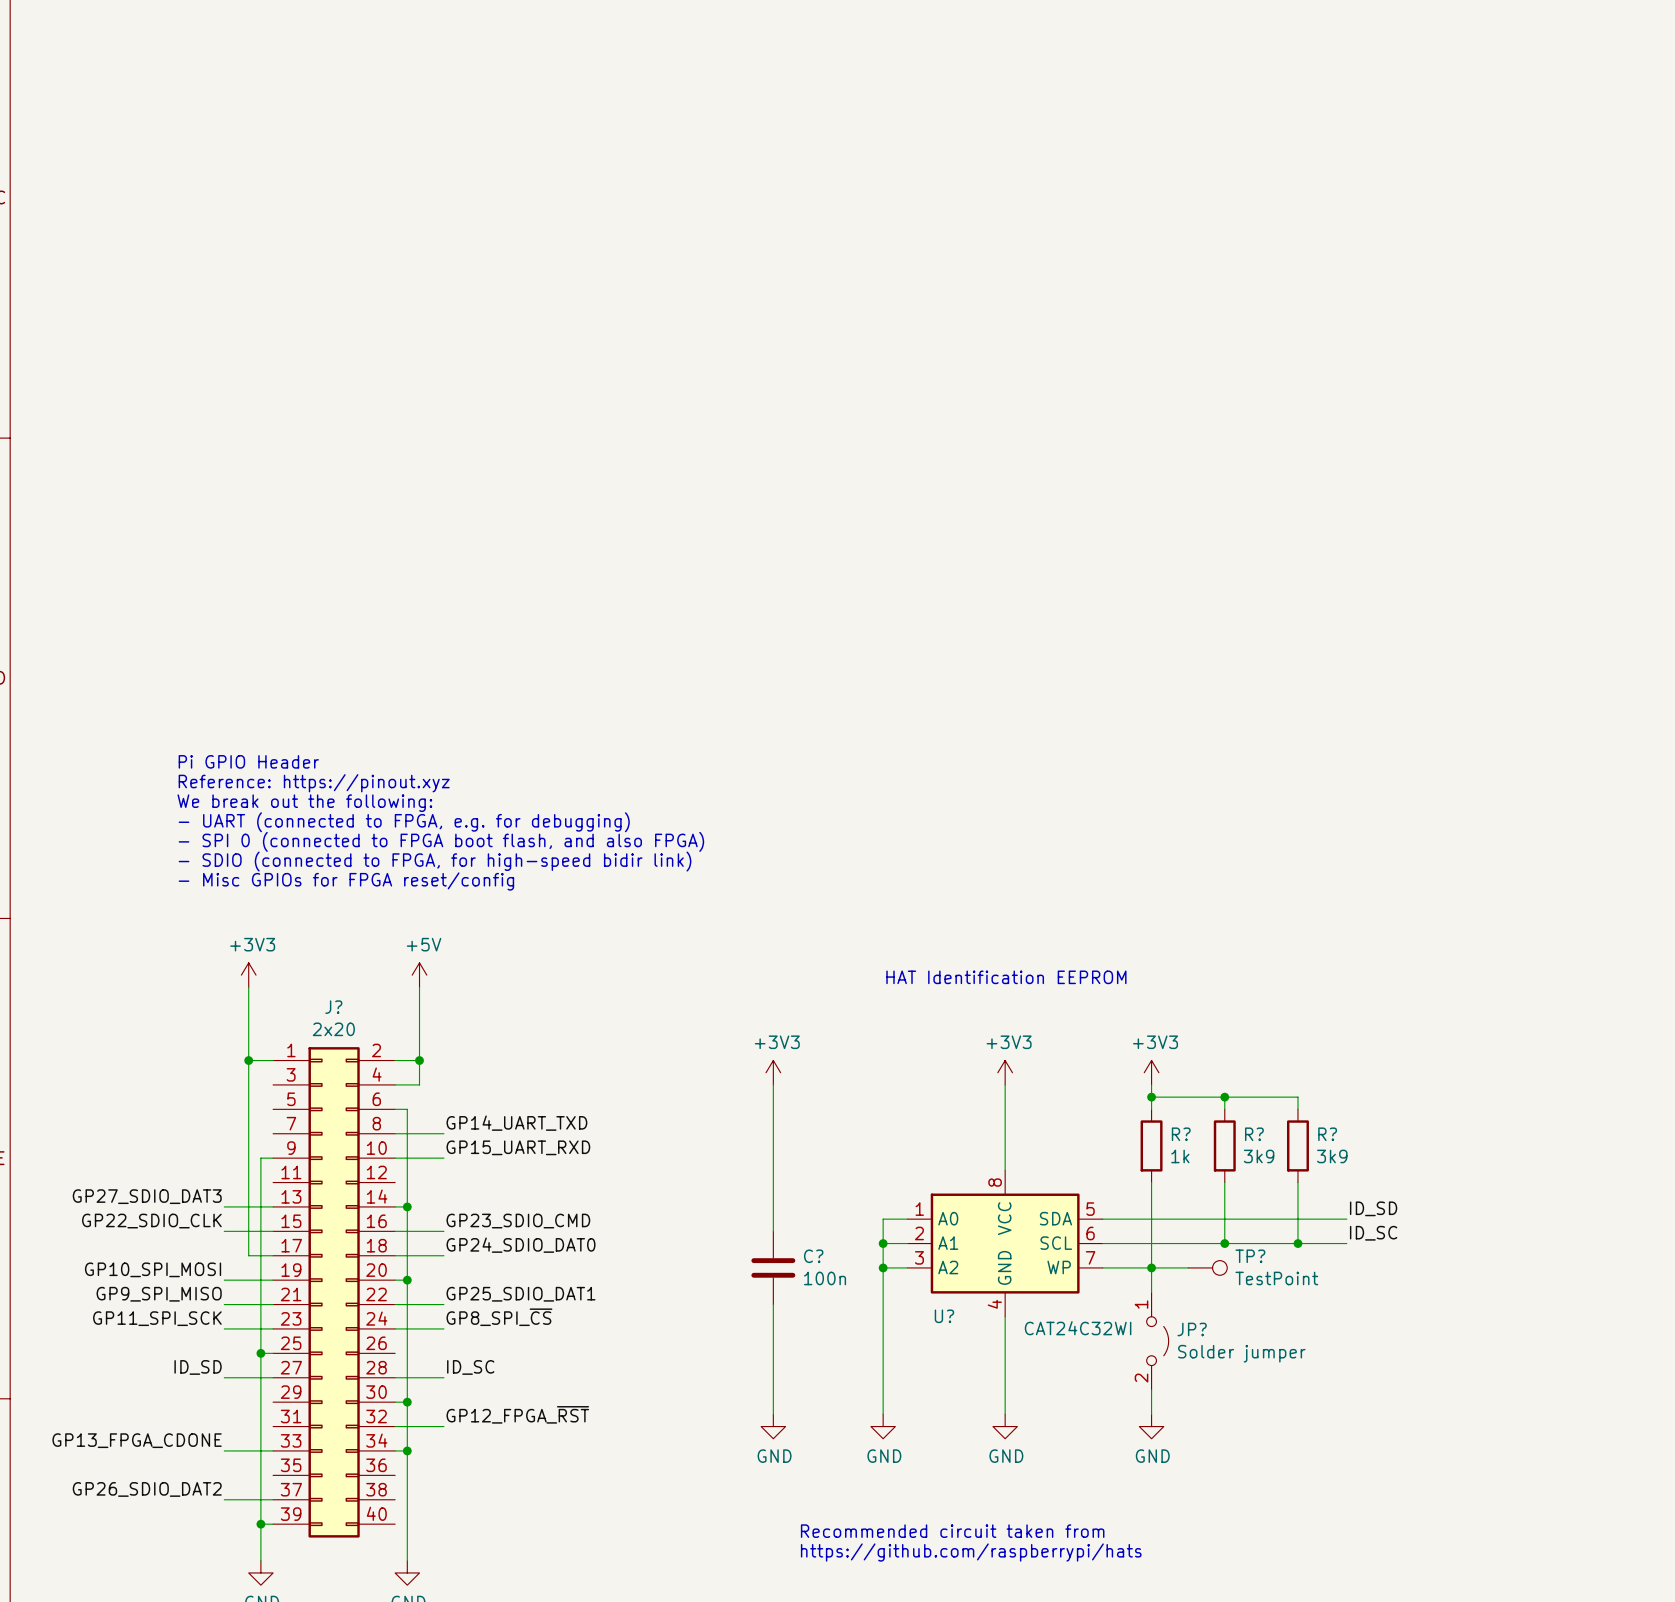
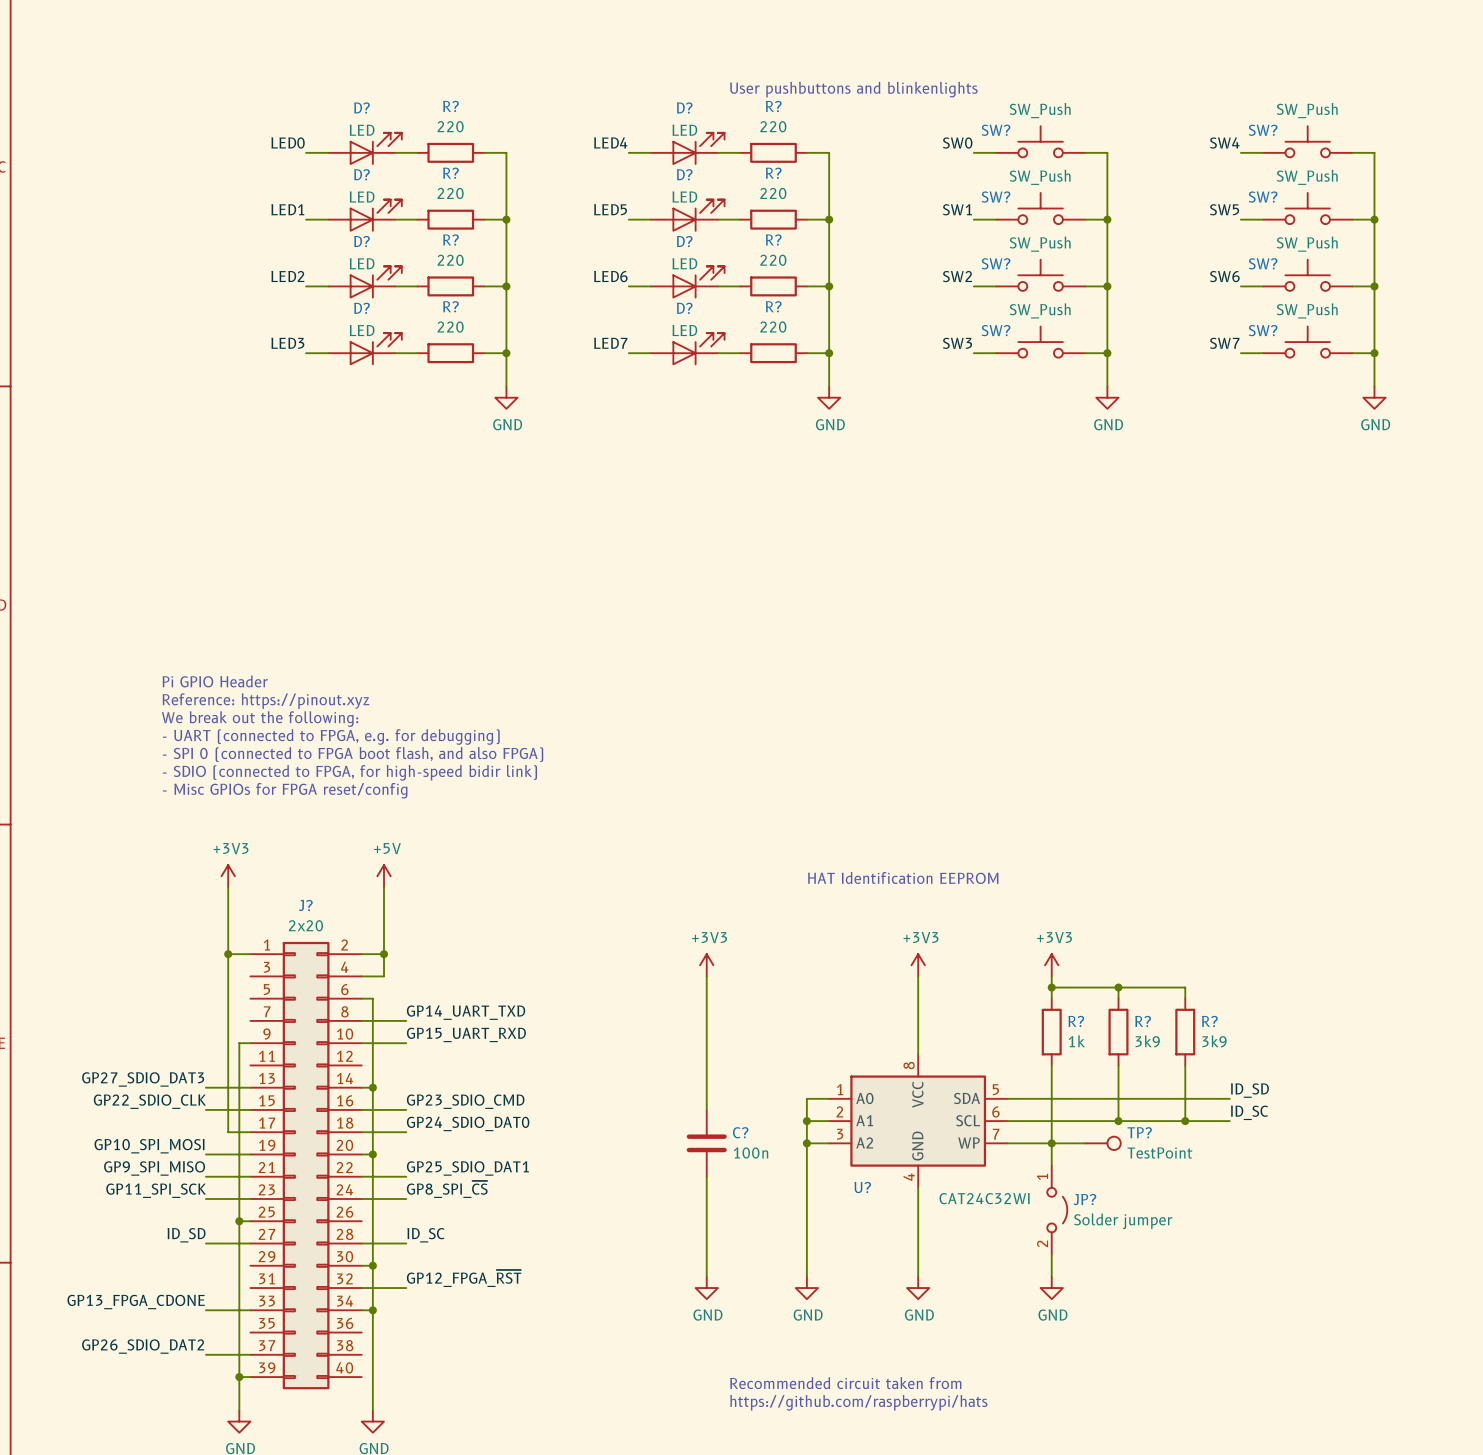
text: none -> User pushbuttons and blinkenlights (853, 89)
SW?: none -> SW_Push (1040, 141)
SW?: none -> SW_Push (1307, 141)
label: none -> LED4 (610, 142)
label: none -> SW4 (1224, 143)
label: none -> LED0 (288, 143)
label: none -> SW0 (957, 143)
D?: none -> LED (365, 148)
D?: none -> LED (687, 148)
wire: none -> (306, 152) (328, 152)
wire: none -> (395, 152) (417, 152)
R?: none -> 220 (450, 152)
wire: none -> (484, 152) (506, 152) (506, 386)
wire: none -> (628, 152) (651, 152)
wire: none -> (717, 152) (740, 152)
R?: none -> 220 (773, 152)
wire: none -> (806, 152) (829, 152) (829, 386)
wire: none -> (973, 152) (996, 152)
wire: none -> (1085, 152) (1107, 152) (1107, 386)
wire: none -> (1240, 152) (1263, 152)
wire: none -> (1352, 152) (1374, 152) (1374, 386)
SW?: none -> SW_Push (1040, 208)
SW?: none -> SW_Push (1307, 208)
label: none -> LED1 (287, 209)
label: none -> LED5 (610, 209)
label: none -> SW1 (957, 209)
label: none -> SW5 (1224, 209)
D?: none -> LED (365, 215)
D?: none -> LED (687, 215)
wire: none -> (306, 219) (328, 219)
wire: none -> (395, 219) (417, 219)
R?: none -> 220 (450, 219)
wire: none -> (484, 219) (506, 219)
junction: none -> (506, 219)
wire: none -> (628, 219) (651, 219)
wire: none -> (717, 219) (740, 219)
R?: none -> 220 (773, 219)
wire: none -> (806, 219) (829, 219)
junction: none -> (829, 219)
wire: none -> (973, 219) (996, 219)
wire: none -> (1085, 219) (1107, 219)
junction: none -> (1107, 219)
wire: none -> (1240, 219) (1263, 219)
wire: none -> (1352, 219) (1374, 219)
junction: none -> (1374, 219)
SW?: none -> SW_Push (1040, 275)
SW?: none -> SW_Push (1307, 275)
label: none -> LED2 (287, 276)
label: none -> LED6 (610, 276)
label: none -> SW2 (957, 276)
label: none -> SW6 (1224, 276)
D?: none -> LED (365, 282)
D?: none -> LED (687, 282)
wire: none -> (306, 286) (328, 286)
wire: none -> (395, 286) (417, 286)
R?: none -> 220 (450, 286)
wire: none -> (484, 286) (506, 286)
junction: none -> (506, 286)
wire: none -> (628, 286) (651, 286)
wire: none -> (717, 286) (740, 286)
R?: none -> 220 (773, 286)
wire: none -> (806, 286) (829, 286)
junction: none -> (829, 286)
wire: none -> (973, 286) (996, 286)
wire: none -> (1085, 286) (1107, 286)
junction: none -> (1107, 286)
wire: none -> (1240, 286) (1263, 286)
wire: none -> (1352, 286) (1374, 286)
junction: none -> (1374, 286)
SW?: none -> SW_Push (1040, 342)
SW?: none -> SW_Push (1307, 342)
label: none -> LED3 (287, 343)
label: none -> LED7 (610, 343)
label: none -> SW3 (957, 343)
label: none -> SW7 (1224, 343)
D?: none -> LED (365, 349)
D?: none -> LED (687, 349)
wire: none -> (306, 353) (328, 353)
wire: none -> (395, 353) (417, 353)
R?: none -> 220 (450, 353)
wire: none -> (484, 353) (506, 353)
junction: none -> (506, 353)
wire: none -> (628, 353) (651, 353)
wire: none -> (717, 353) (740, 353)
R?: none -> 220 (773, 353)
wire: none -> (806, 353) (829, 353)
junction: none -> (829, 353)
wire: none -> (973, 353) (996, 353)
wire: none -> (1085, 353) (1107, 353)
junction: none -> (1107, 353)
wire: none -> (1240, 353) (1263, 353)
wire: none -> (1352, 353) (1374, 353)
junction: none -> (1374, 353)
power symbol: none -> GND (506, 397)
power symbol: none -> GND (829, 397)
power symbol: none -> GND (1107, 397)
power symbol: none -> GND (1374, 397)

